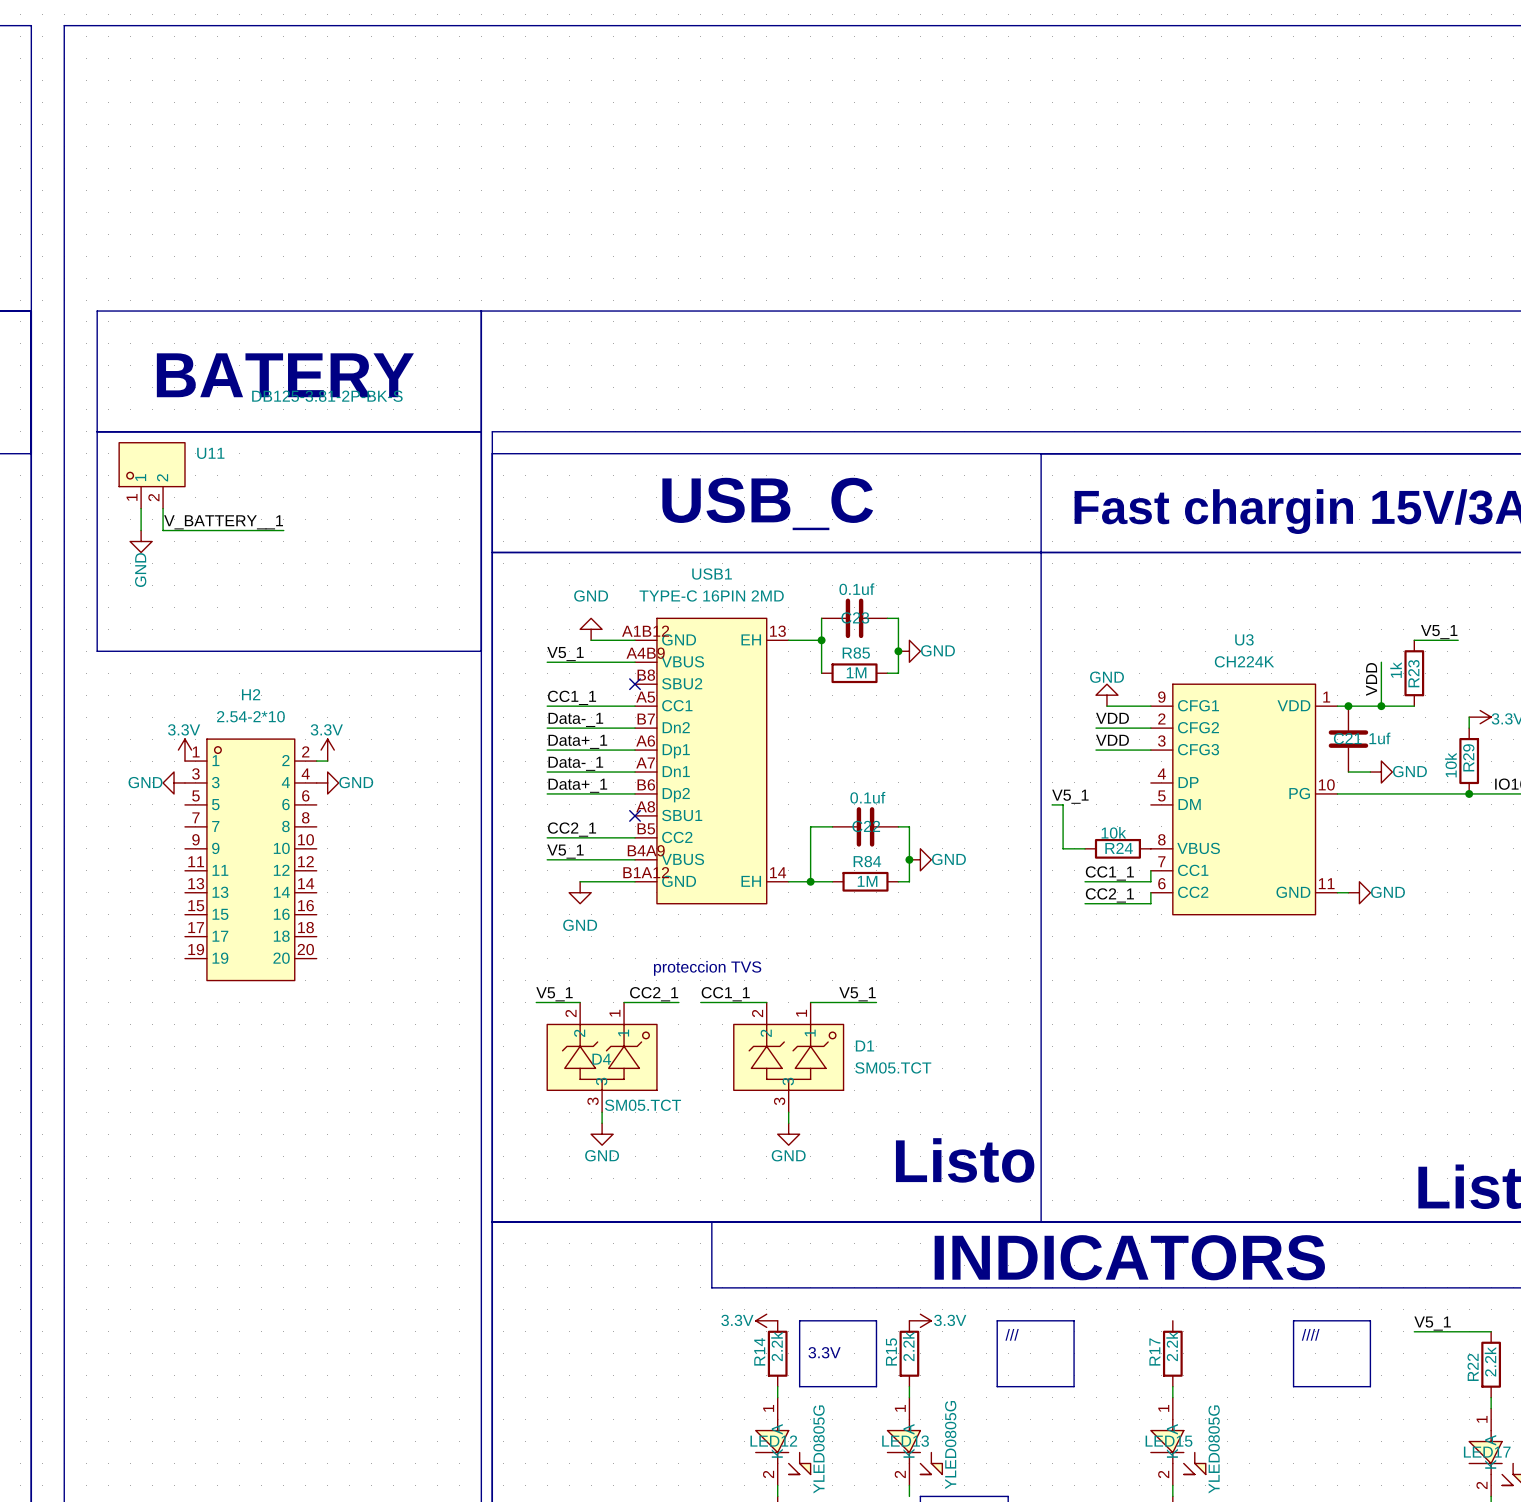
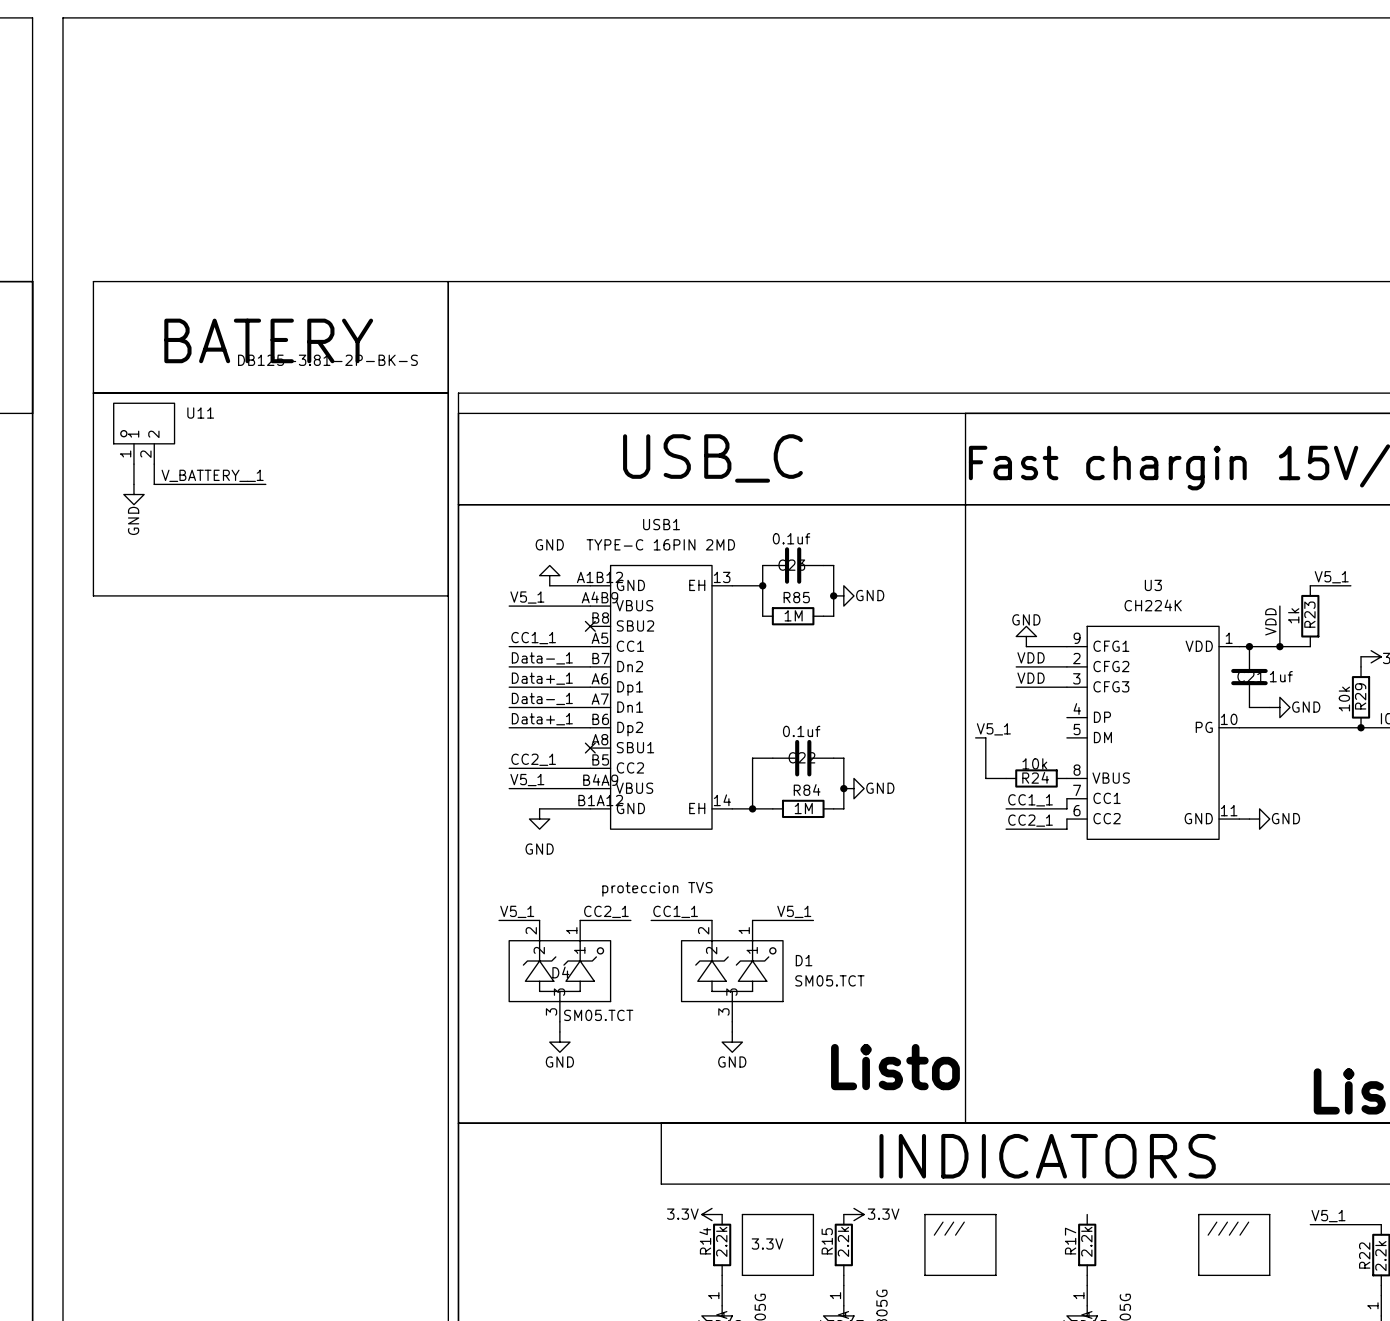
power symbol: 3.3V (184, 750) -> none
power symbol: 3.3V (327, 750) -> none
wire: (316, 761) (327, 761) -> none
power symbol: GND (174, 782) -> none
power symbol: GND (327, 782) -> none
H2: 2.54-2*10 (250, 859) -> none

